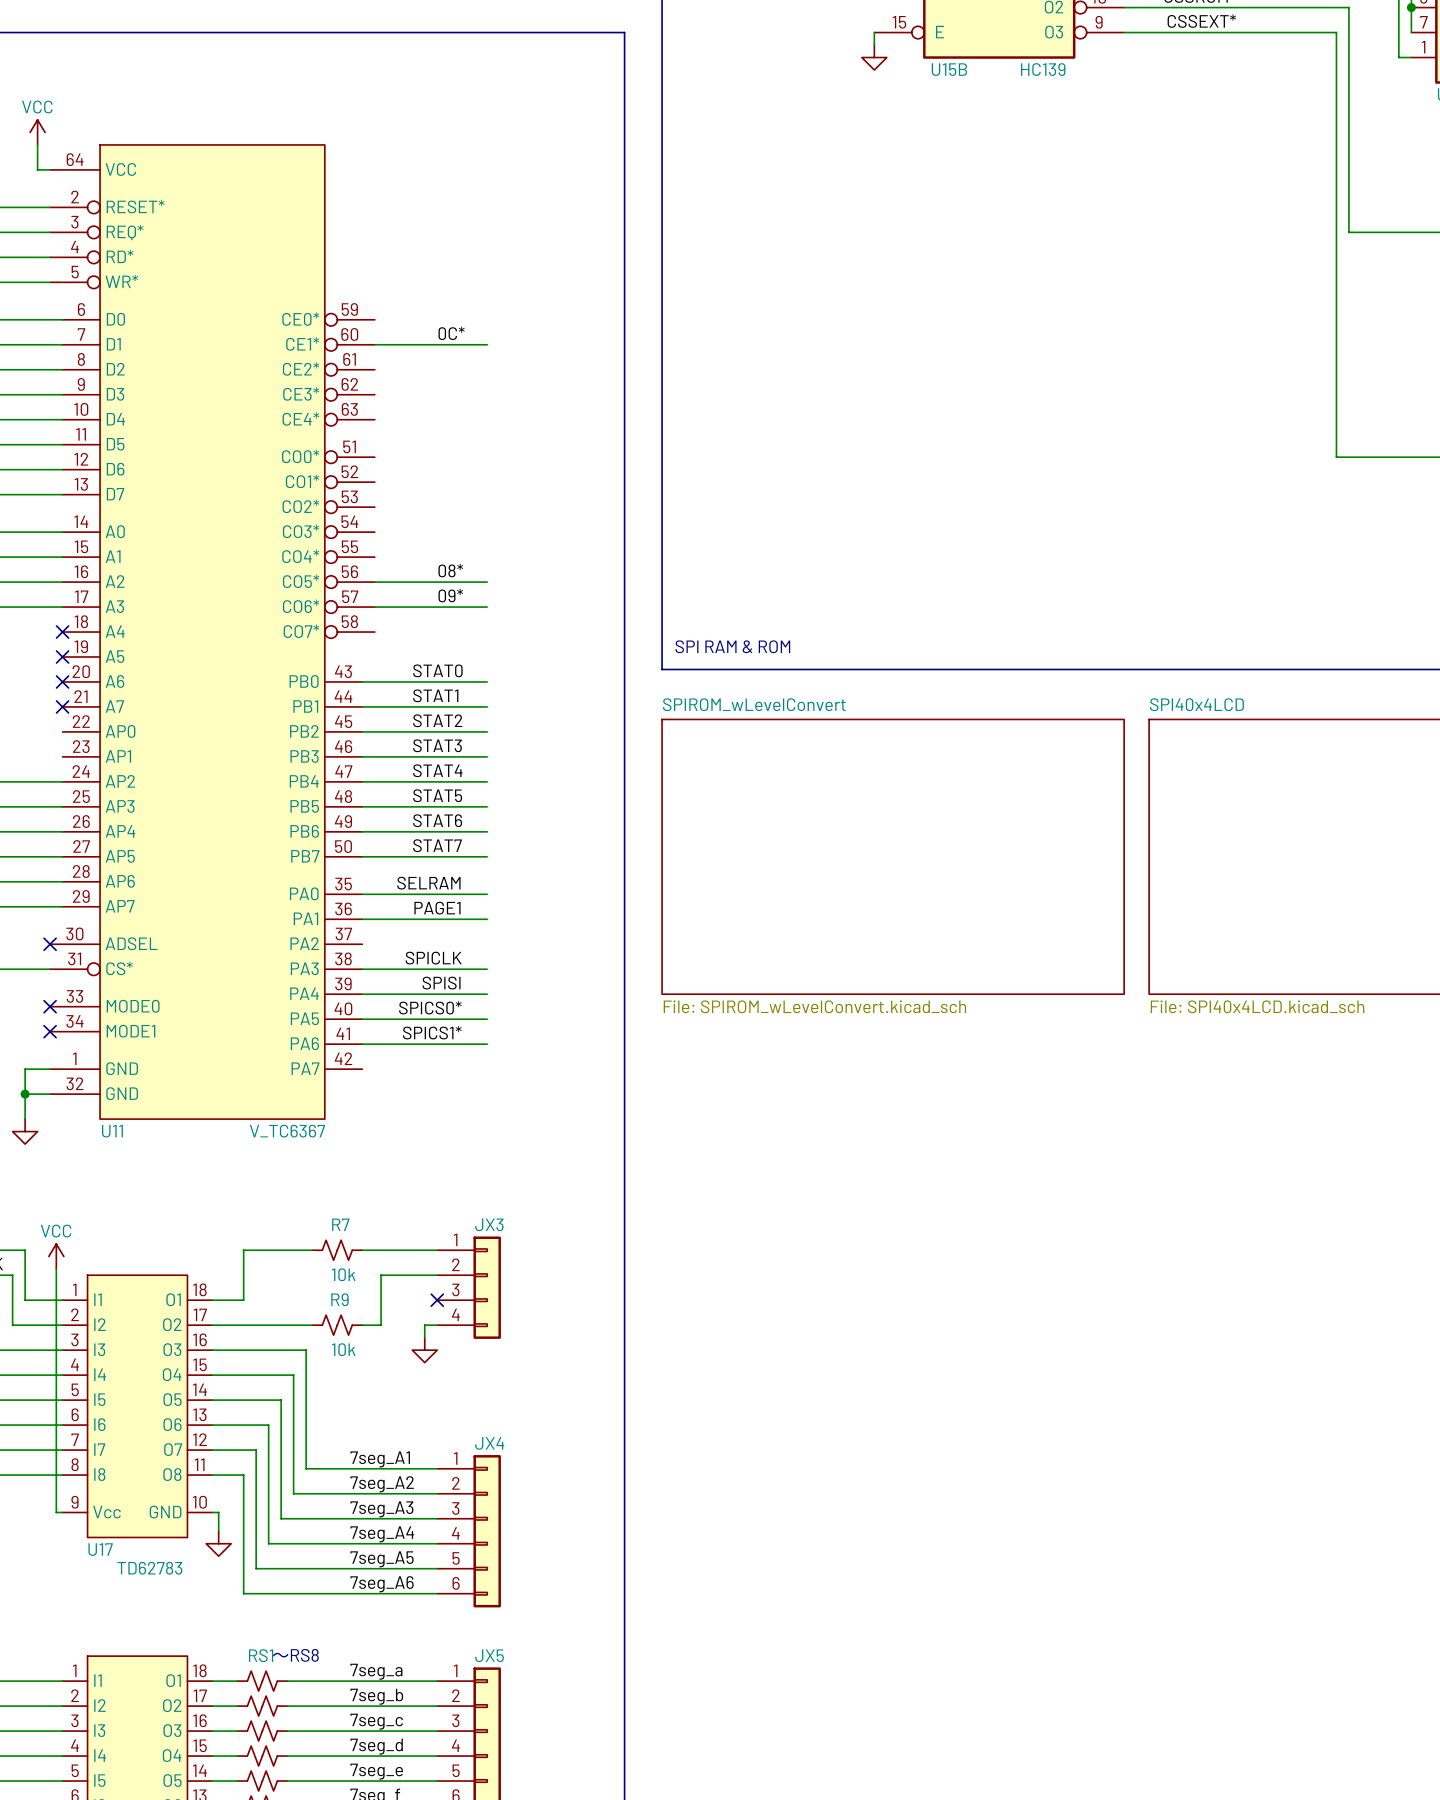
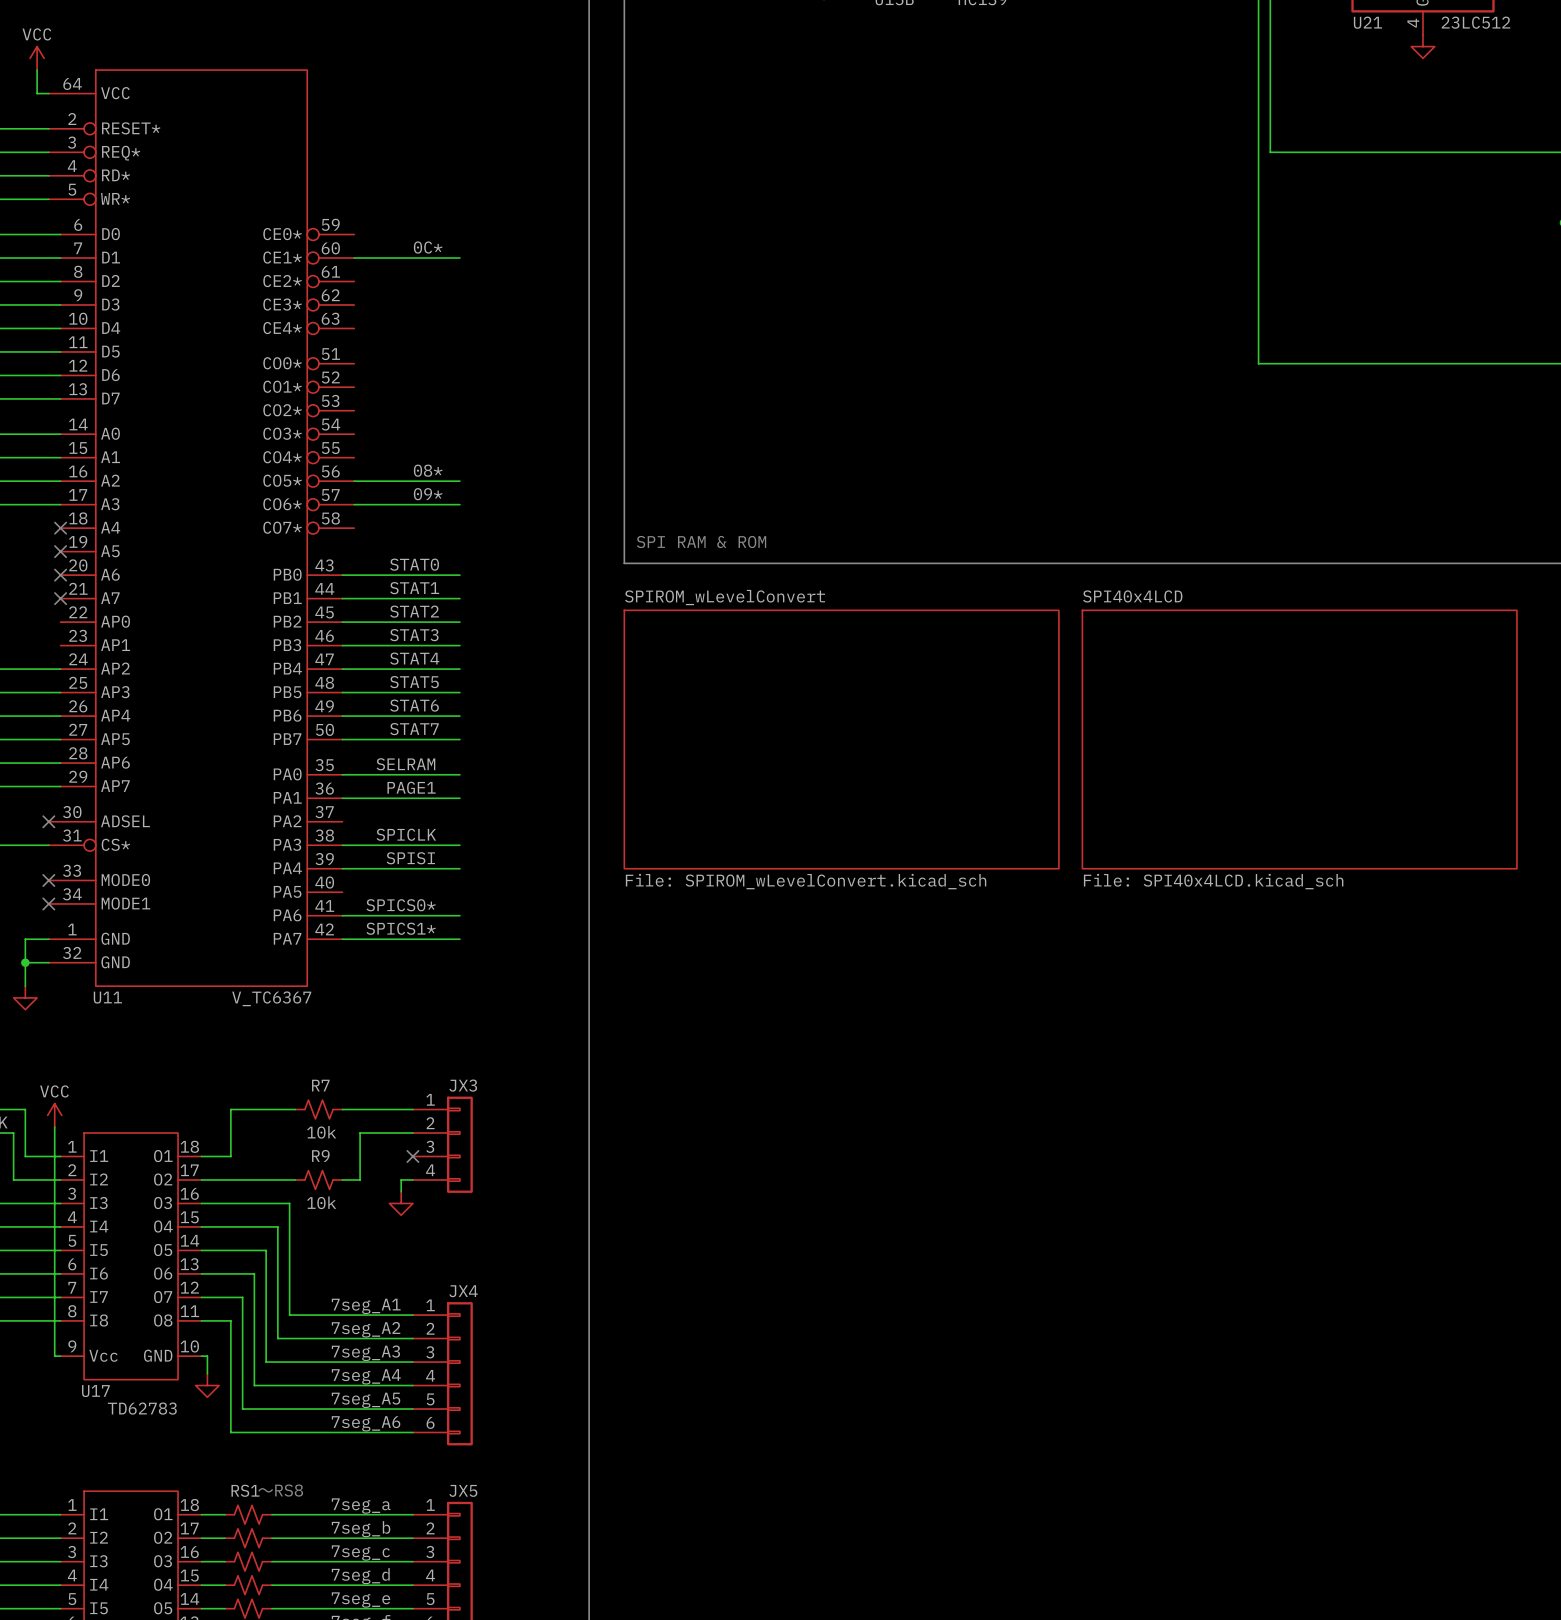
label: SPICS0* (430, 1007) -> none
wire: (362, 1019) (487, 1019) -> (342, 939) (459, 939)
label: SPICS1* (432, 1032) -> SPICS0* (401, 905)
label: none -> SPICS1* (401, 928)

